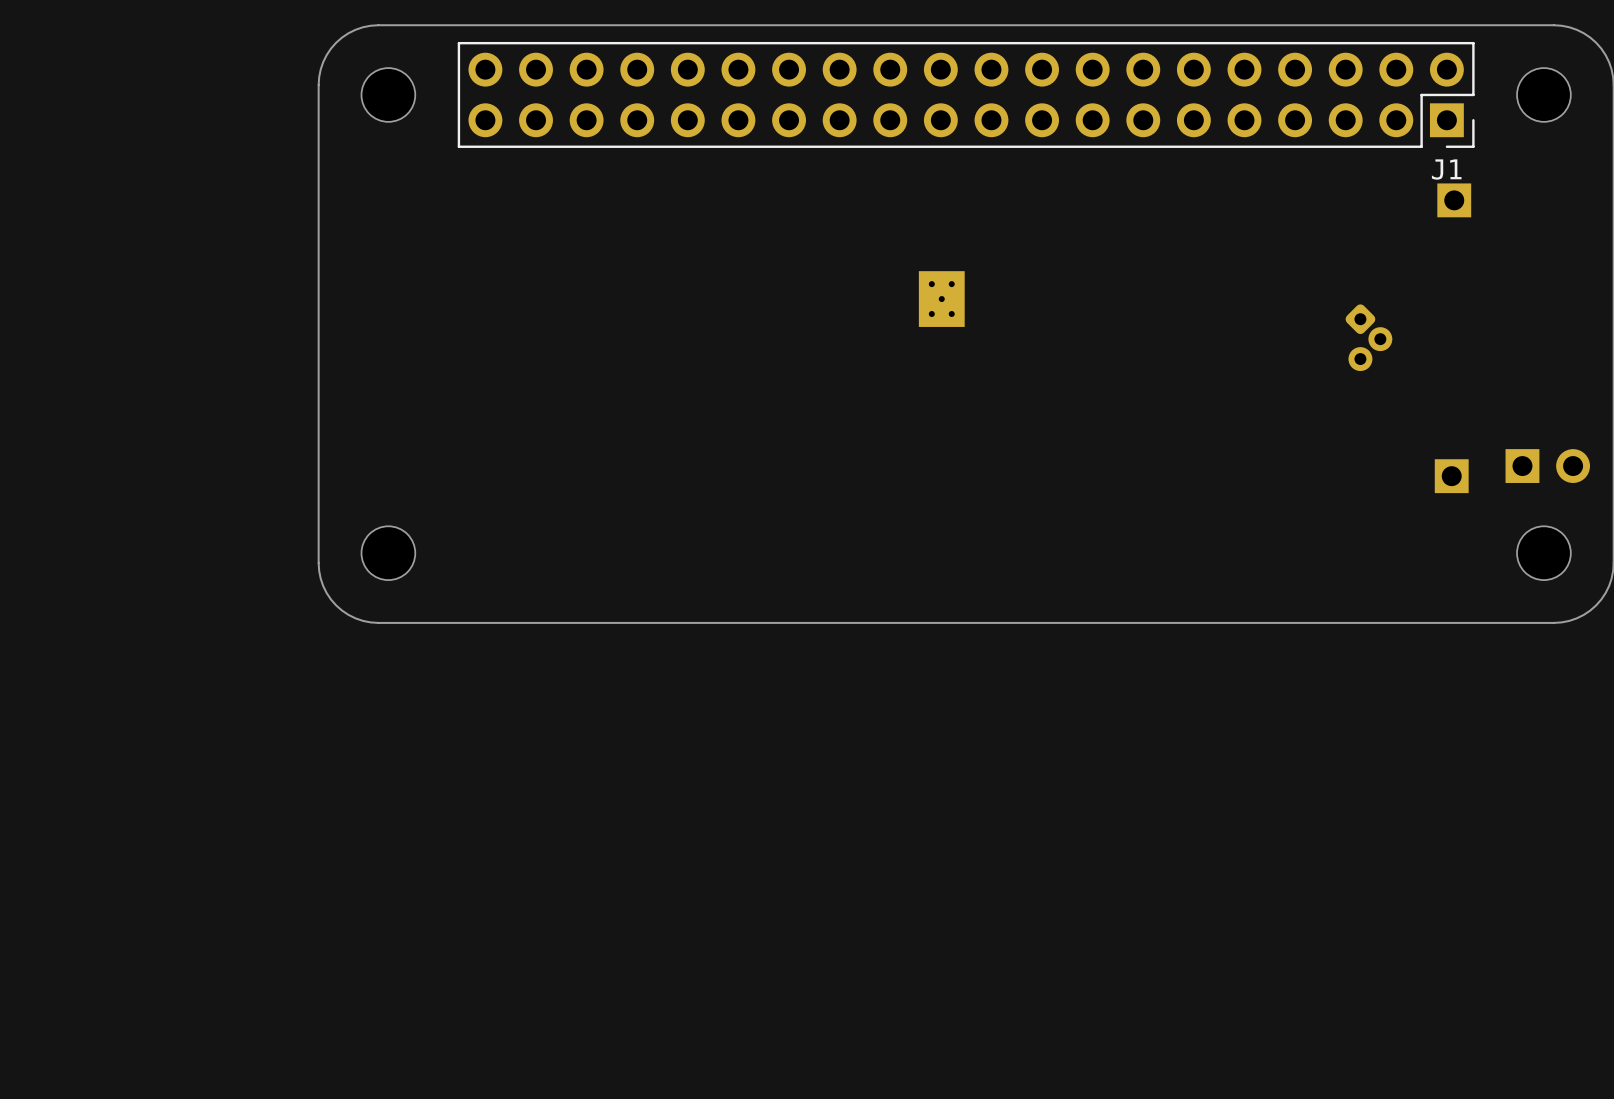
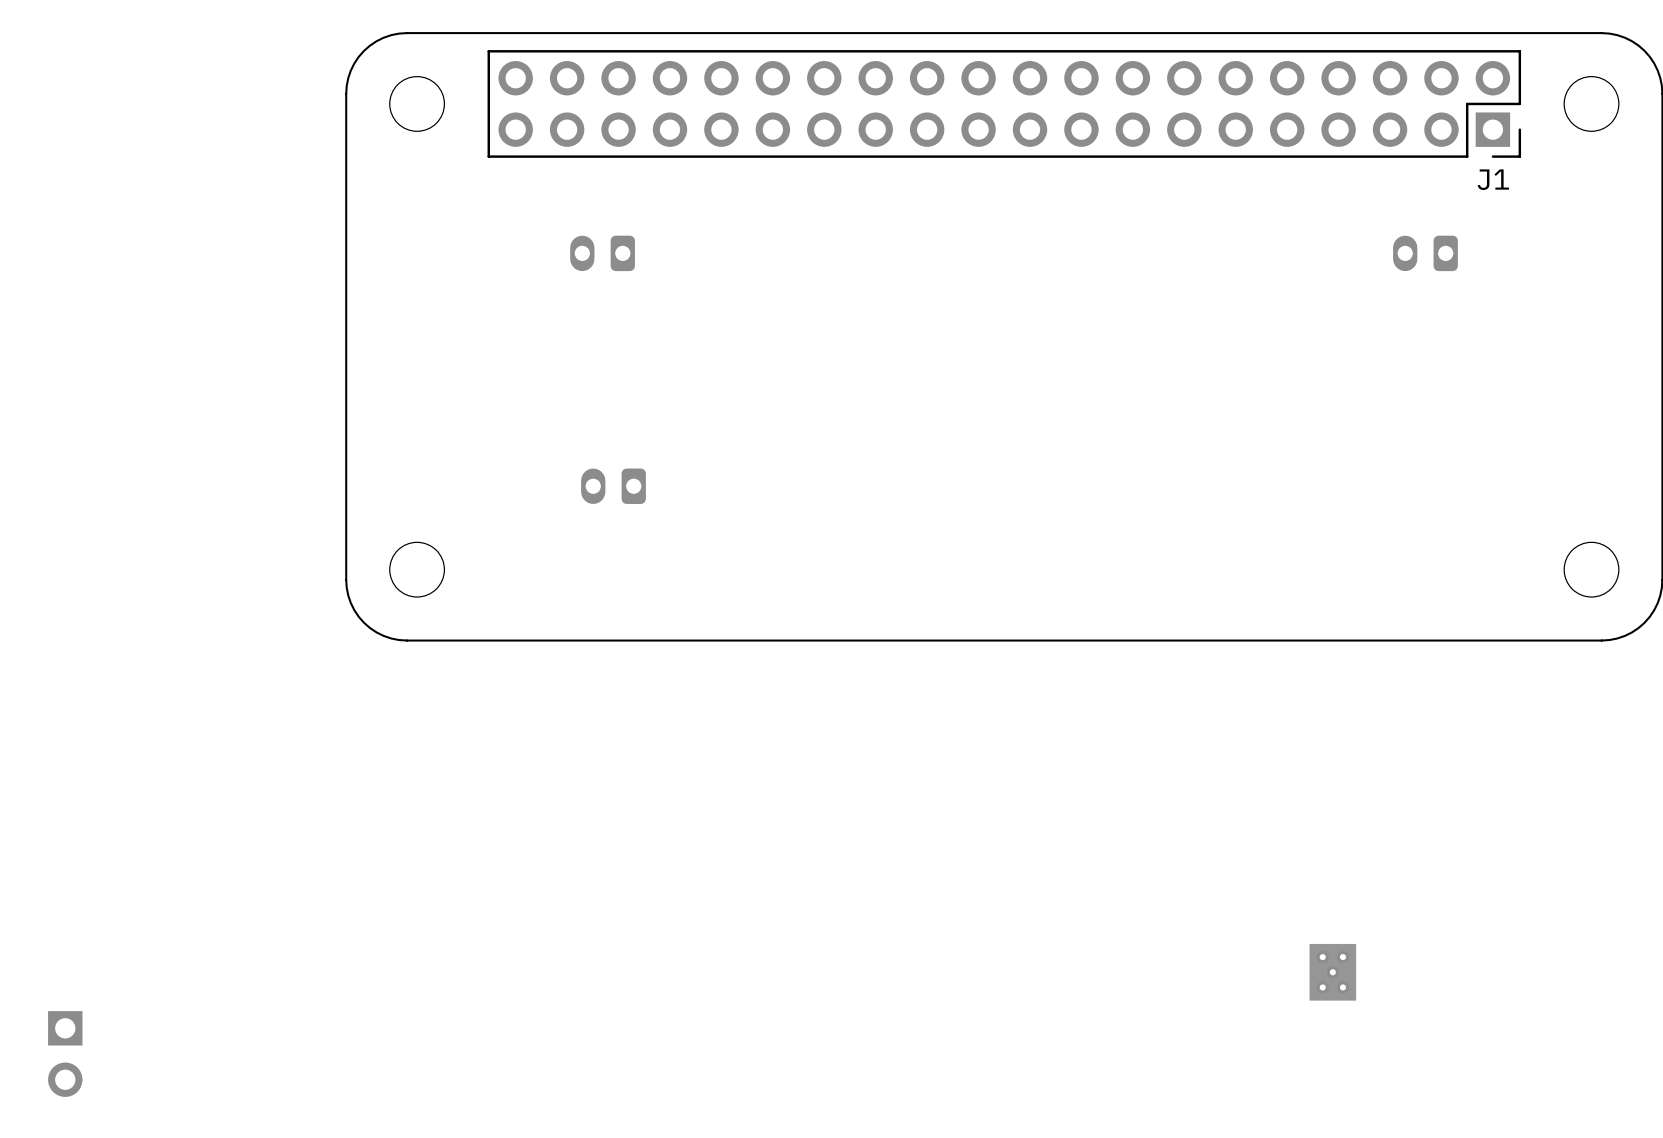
part: (1454, 200) -> none
part: none -> (602, 253)
part: none -> (1425, 253)
part: (941, 299) -> none
part: (1368, 337) -> none
part: (1547, 466) -> none
part: none -> (613, 486)
part: (1451, 476) -> none
part: none -> (1332, 972)
part: none -> (65, 1054)

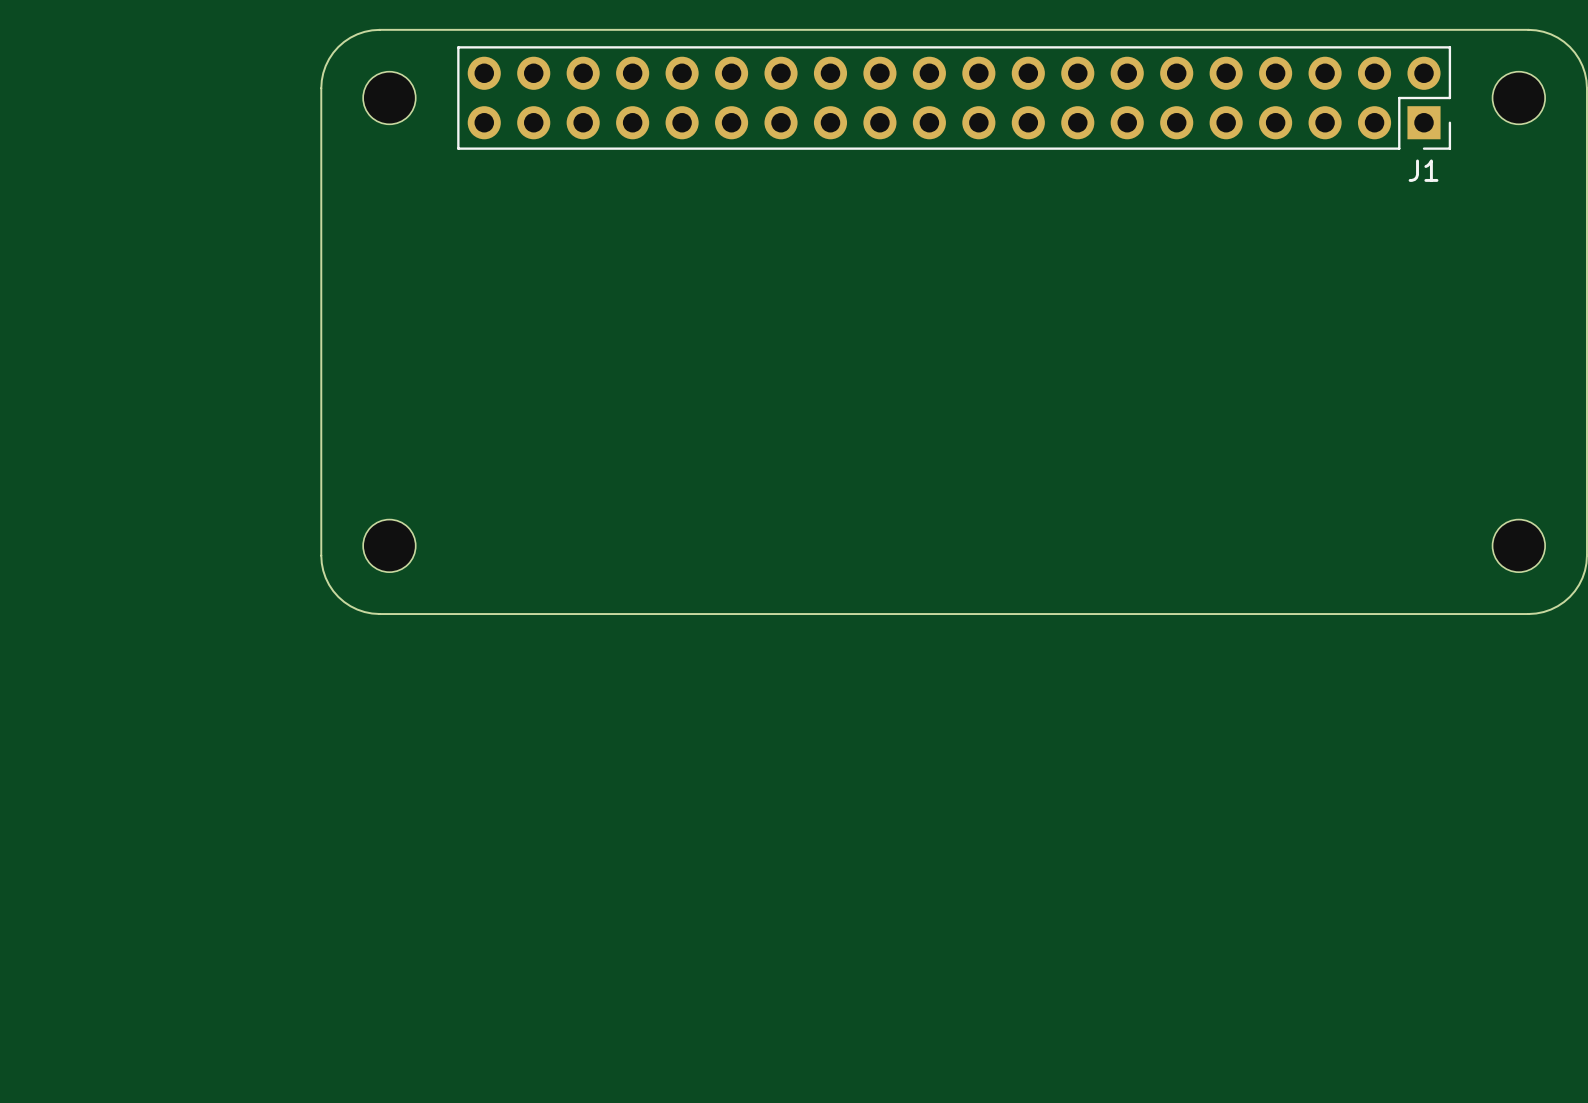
part: (602, 253) -> none
part: (1425, 253) -> none
part: (613, 486) -> none
part: (1332, 972) -> none
part: (65, 1054) -> none

